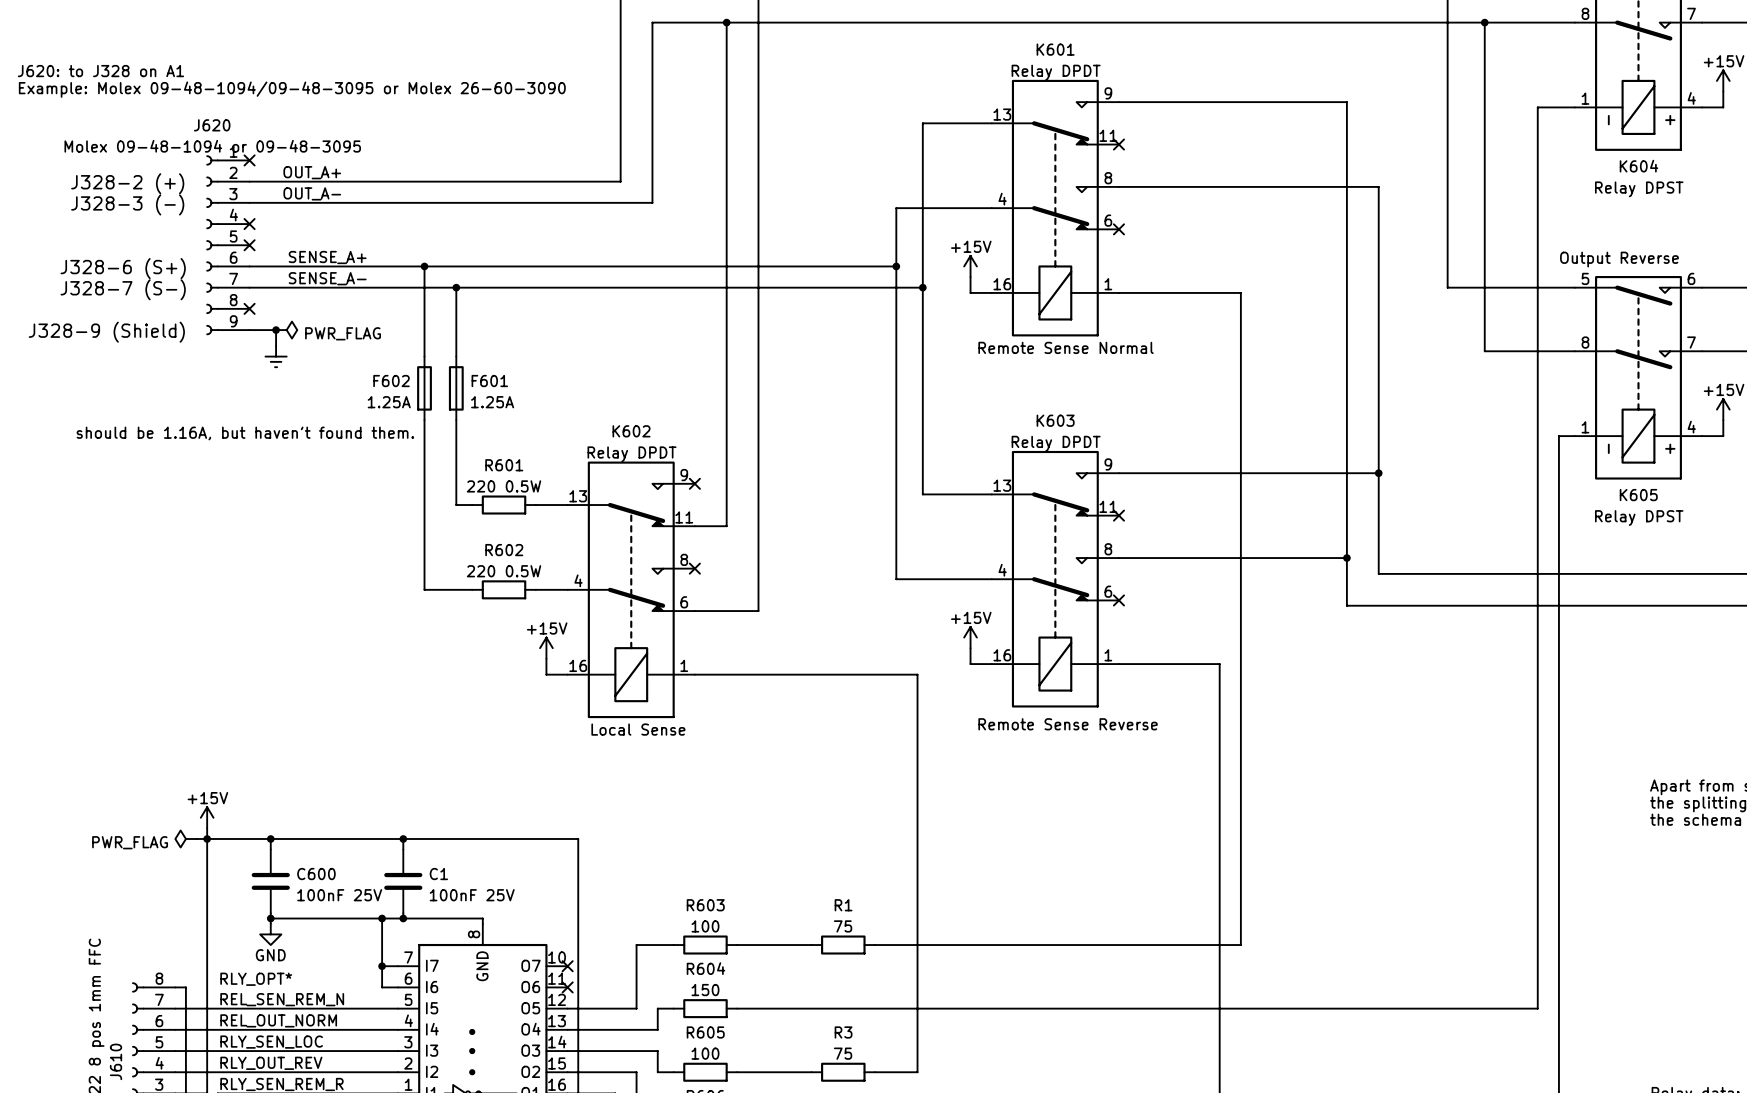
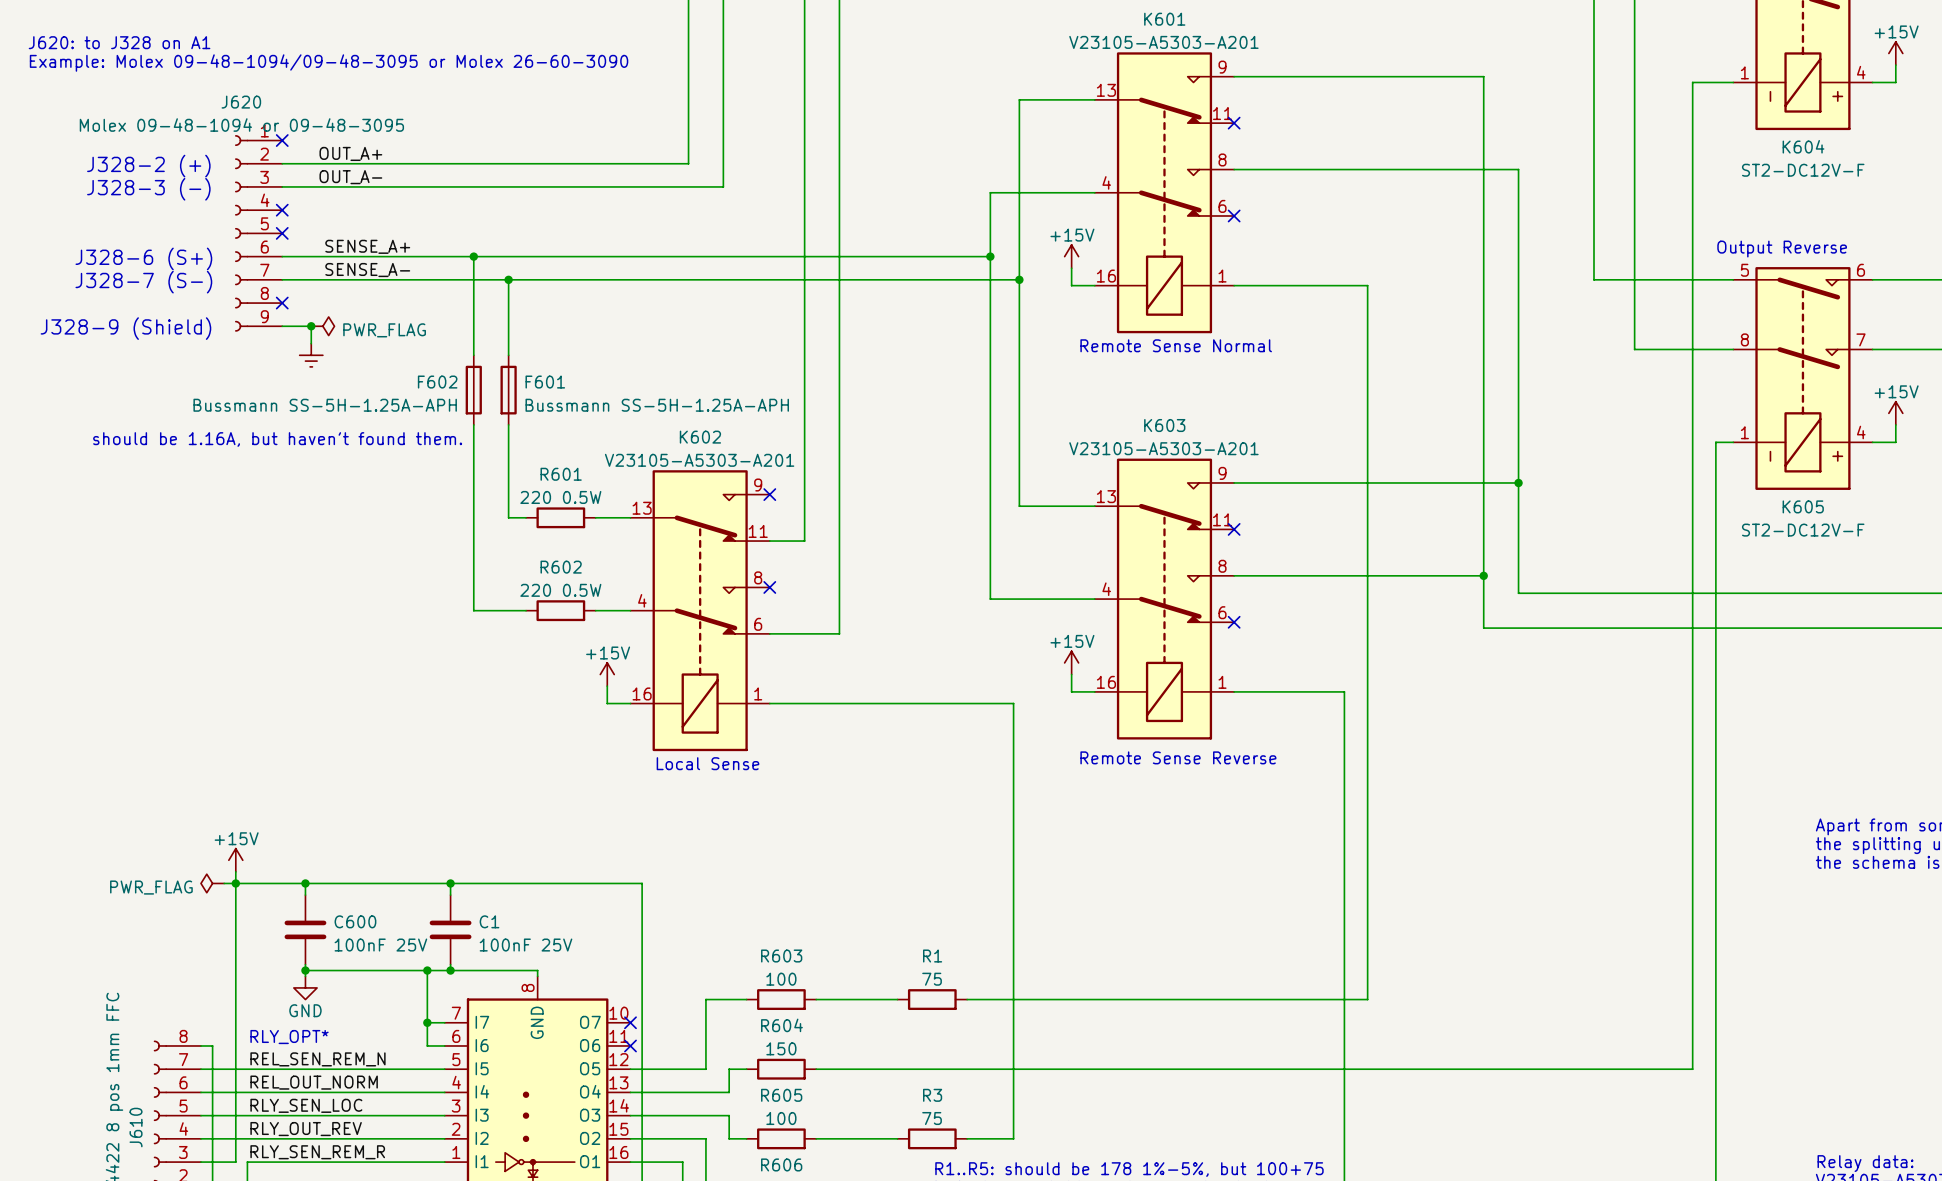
K601 value: Relay DPDT (1056, 72) -> V23105-A5303-A201 (1163, 42)
K604 value: Relay DPST (1639, 189) -> ST2-DC12V-F (1803, 170)
F602 value: 1.25A (389, 402) -> Bussmann SS-5H-1.25A-APH (325, 405)
F601 value: 1.25A (492, 402) -> Bussmann SS-5H-1.25A-APH (657, 405)
K603 value: Relay DPDT (1056, 443) -> V23105-A5303-A201 (1163, 448)
K602 value: Relay DPDT (632, 454) -> V23105-A5303-A201 (699, 460)
K605 value: Relay DPST (1639, 518) -> ST2-DC12V-F (1803, 530)

